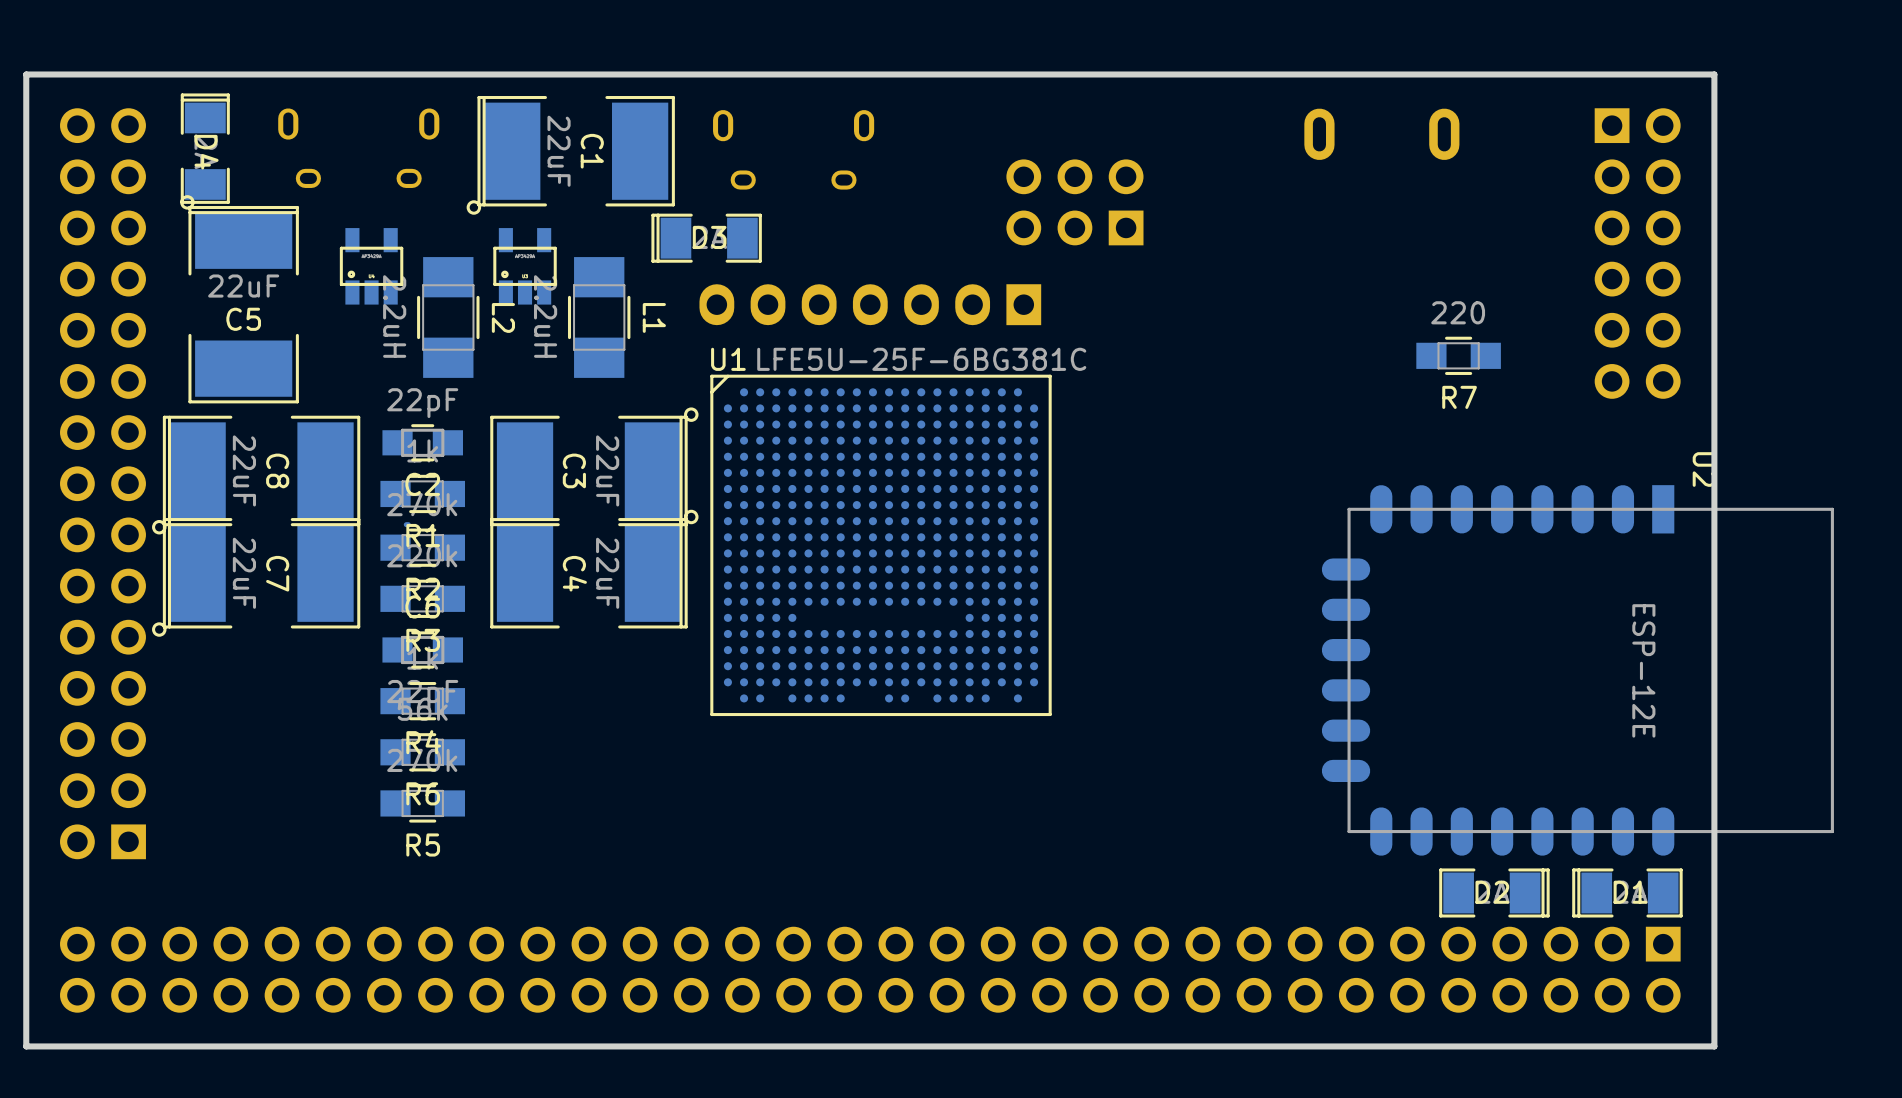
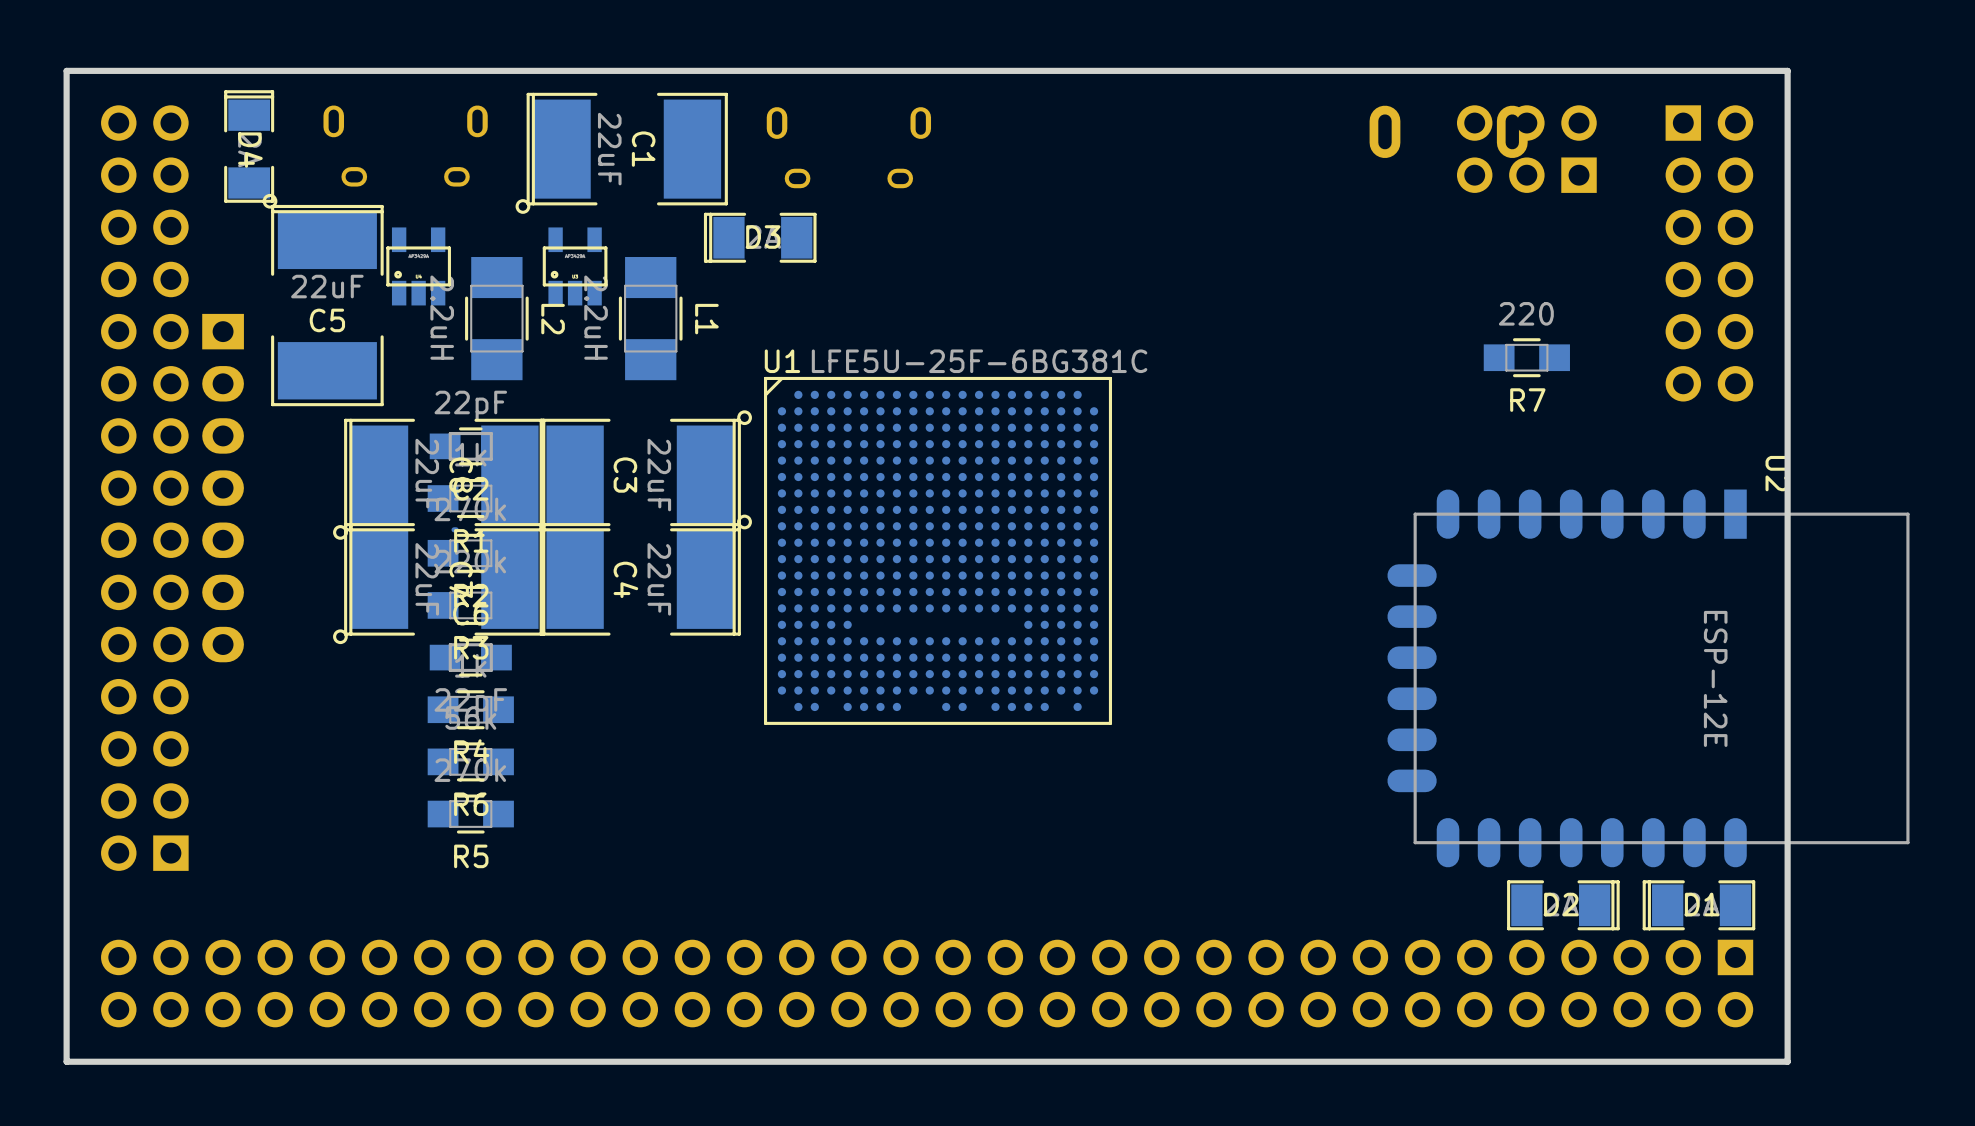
part position: (1074, 202) -> (1526, 149)
C5 position: (239, 299) -> (323, 300)
part: (870, 304) -> none
C8 position: (256, 475) -> (439, 479)
part: none -> (223, 488)
C7 position: (256, 577) -> (439, 583)

